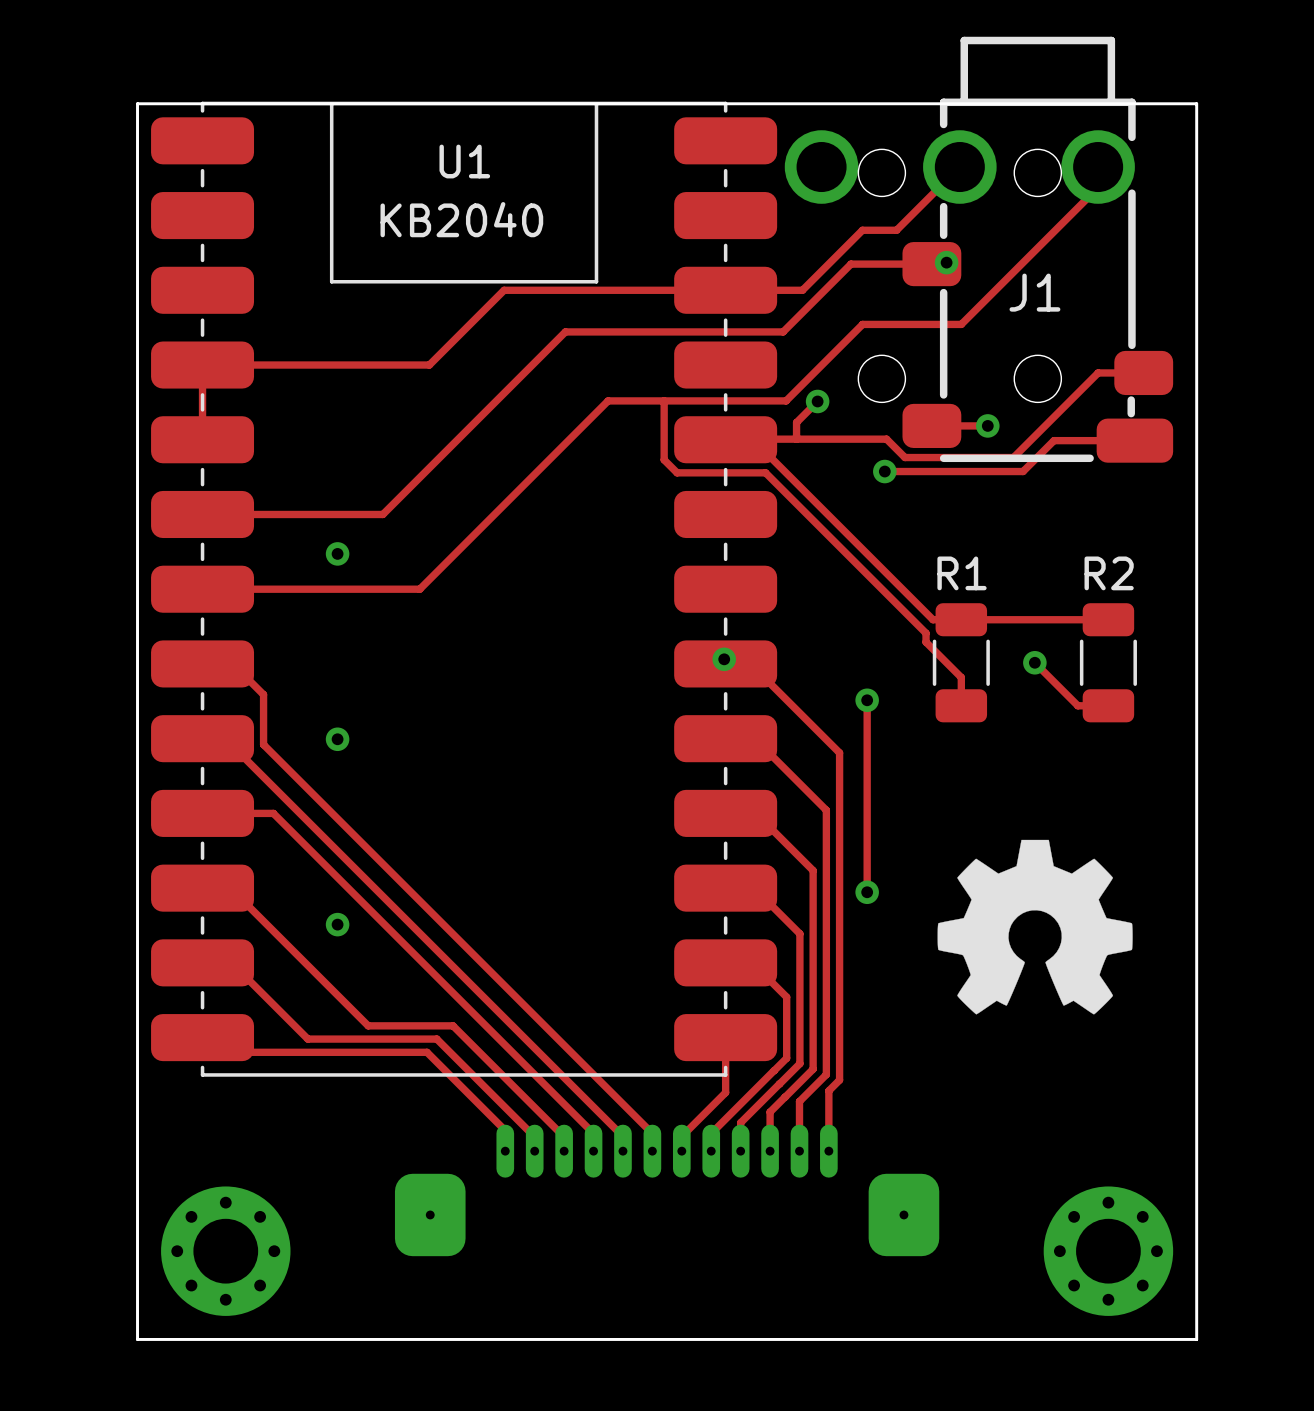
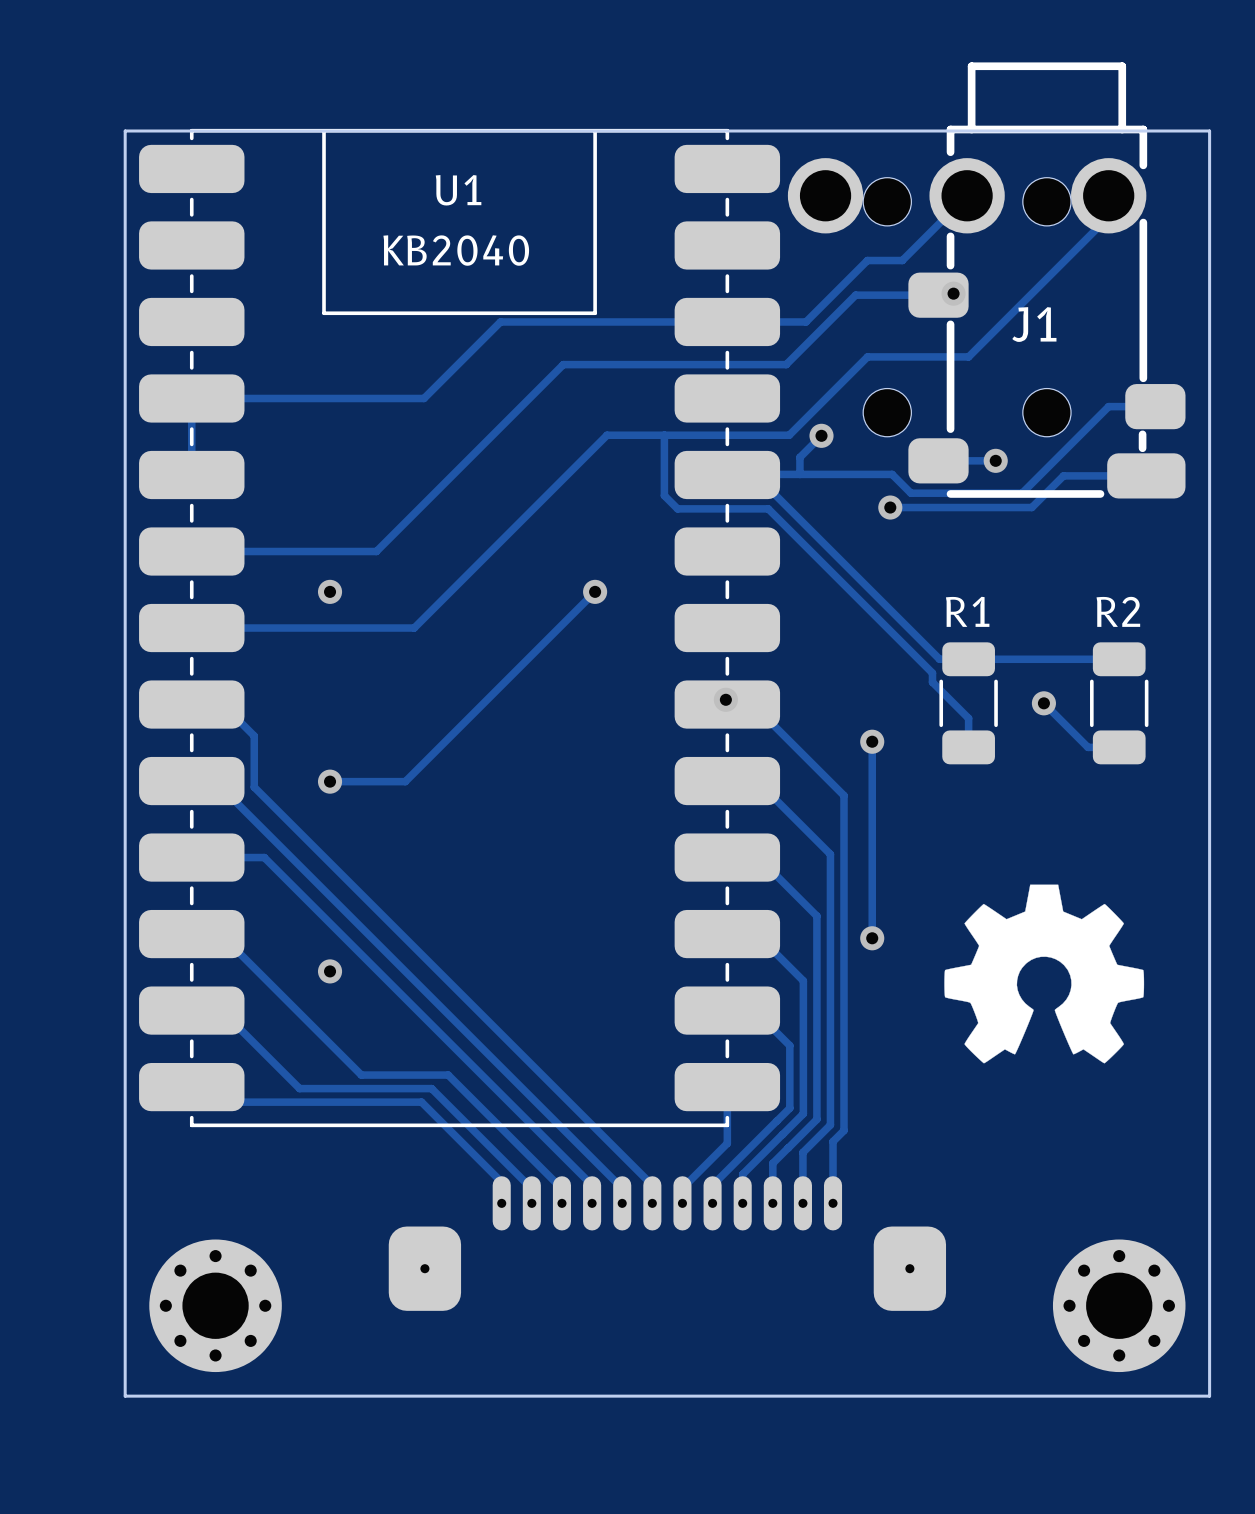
track: none -> (595, 591) (405, 781) (330, 781)
via: none -> (595, 591)

